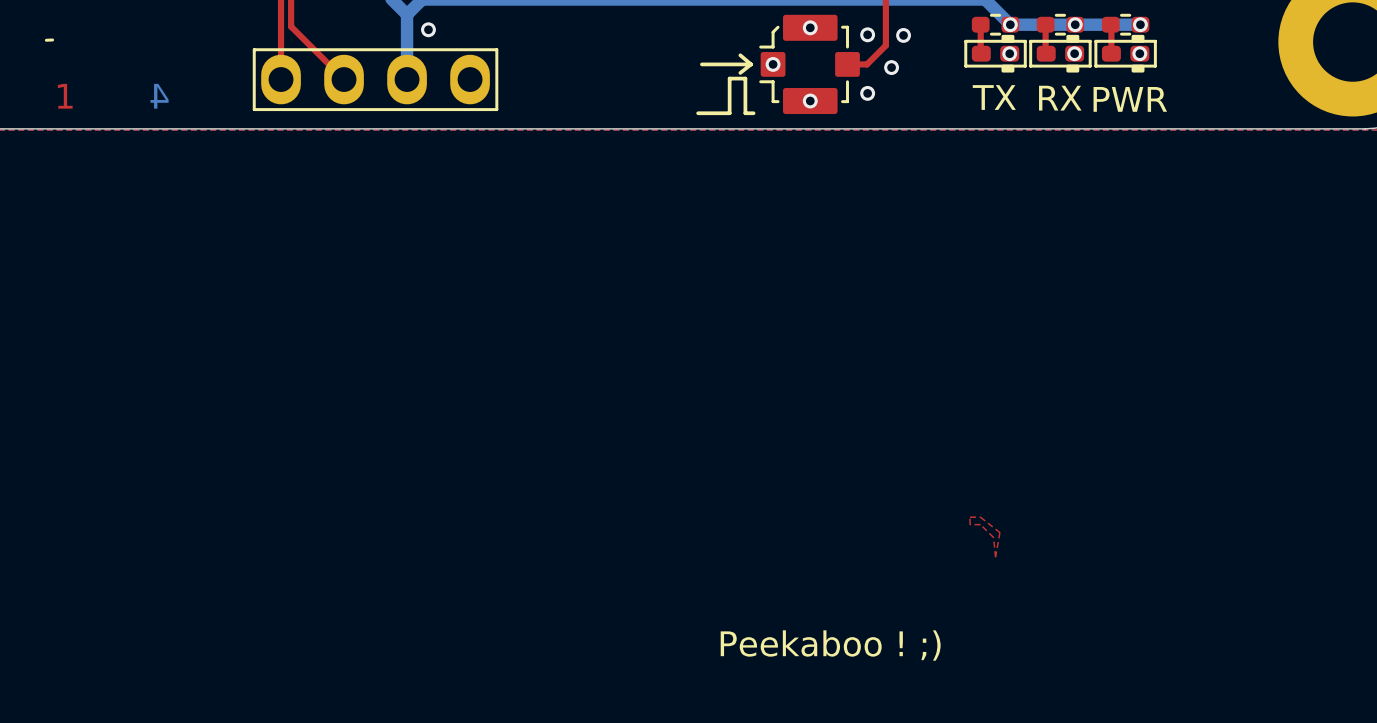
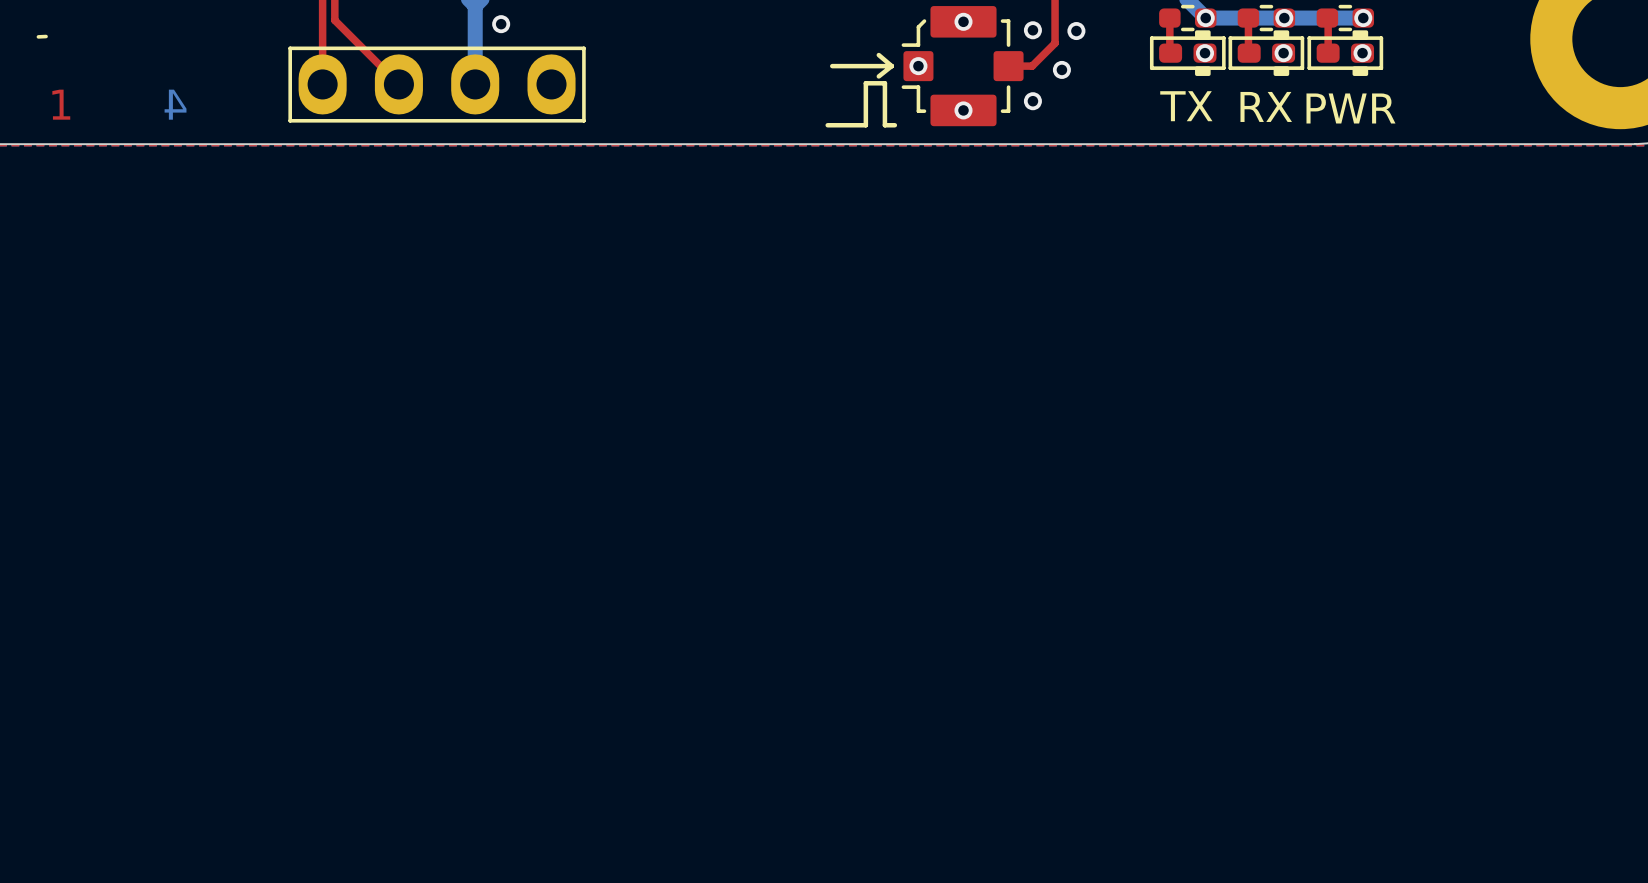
top zone outline: (969, 517) (980, 517) (999, 532) (995, 557) (993, 537) (980, 524) (969, 524) (969, 517) -> none
text: Peekaboo ! ;) (830, 645) -> none

